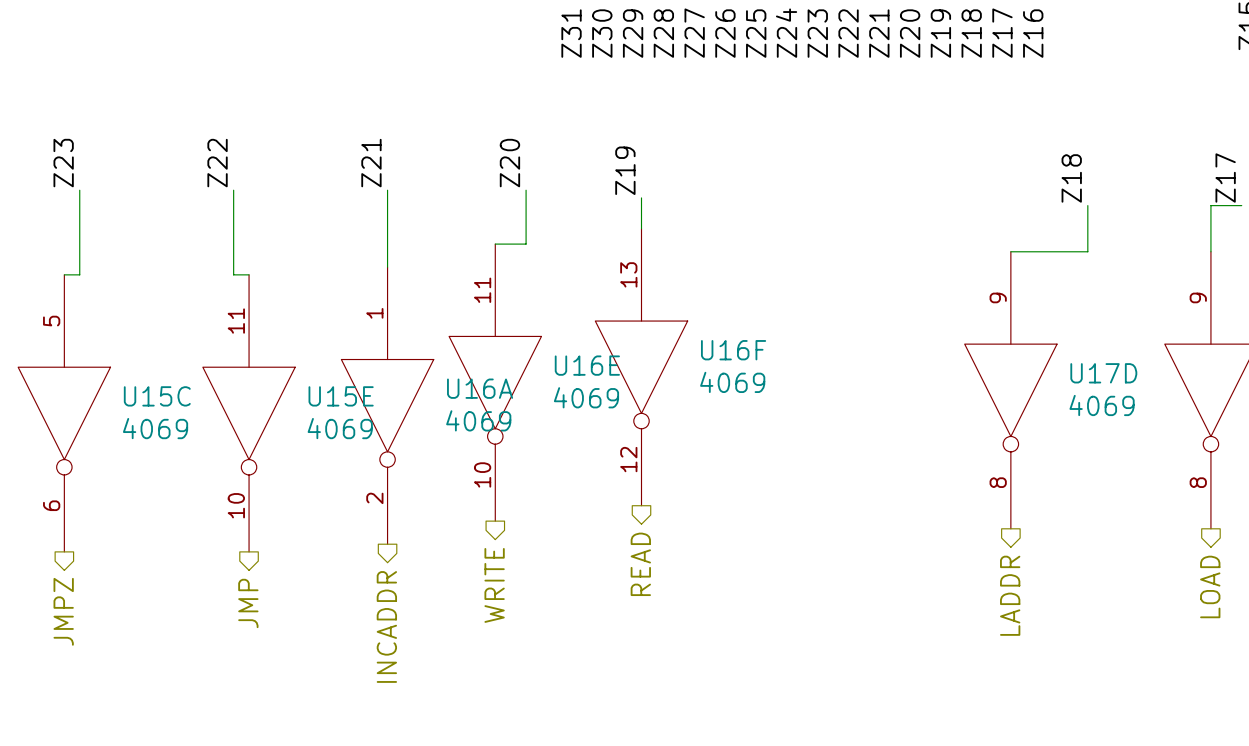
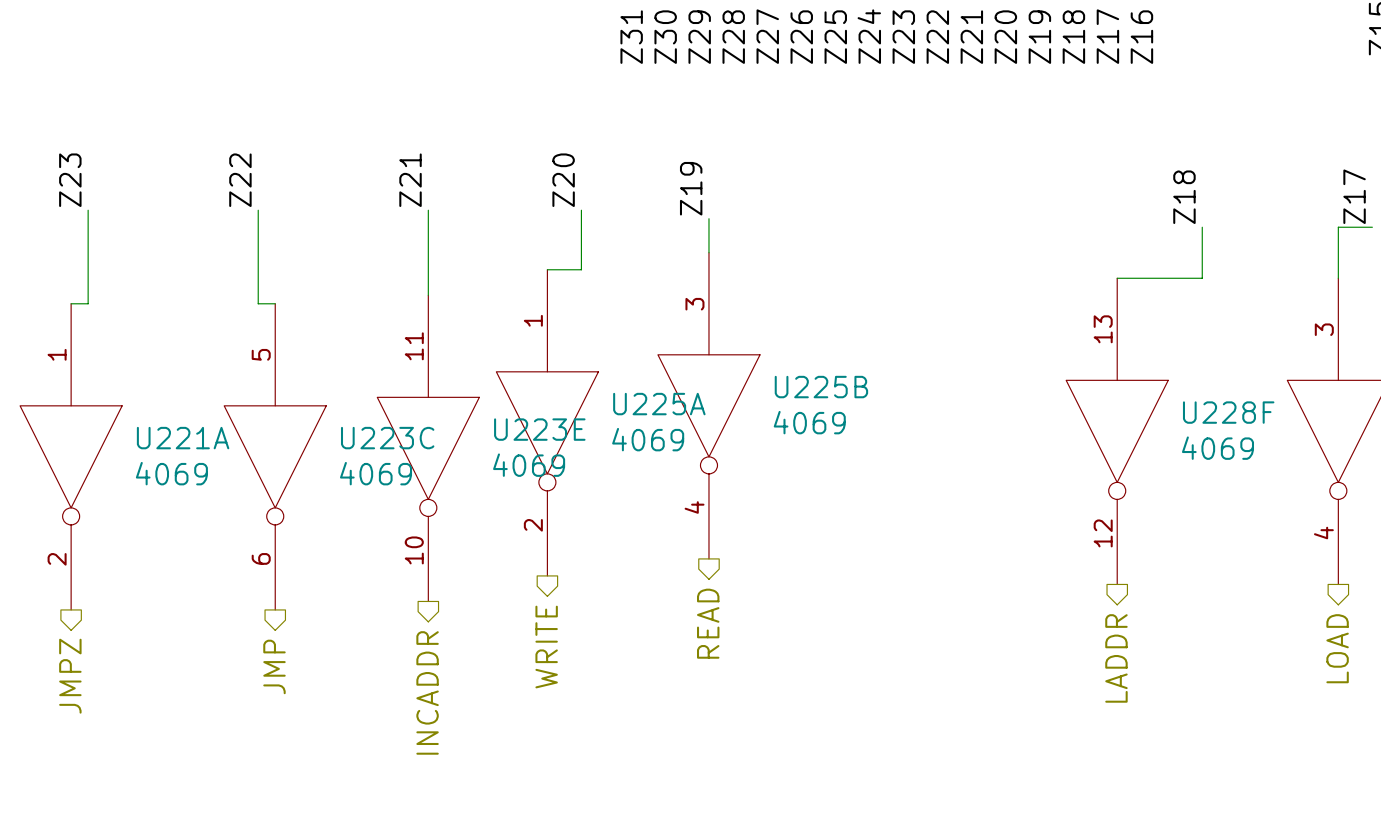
U16F pin number: 13 (628, 274) -> 3 (694, 304)
U16E pin number: 11 (482, 290) -> 1 (533, 320)
U17D pin number: 9 (998, 297) -> 13 (1103, 329)
part pin number: 9 (1198, 297) -> 3 (1324, 329)
U16A pin number: 1 (374, 313) -> 11 (414, 346)
U15C pin number: 5 (51, 321) -> 1 (57, 354)
U15E pin number: 11 (236, 321) -> 5 (261, 354)
U16F name: U16F (733, 350) -> U225B (821, 387)
U16E name: U16E (587, 365) -> U225A (659, 404)
U17D name: U17D (1103, 373) -> U228F (1228, 412)
U16A name: U16A (480, 388) -> U223E (539, 429)
U15C name: U15C (157, 396) -> U221A (183, 438)
U15E name: U15E (341, 396) -> U223C (387, 438)
U16F pin number: 12 (628, 459) -> 4 (694, 507)
U16E pin number: 10 (482, 474) -> 2 (533, 525)
U17D pin number: 8 (998, 482) -> 12 (1103, 533)
part pin number: 8 (1198, 482) -> 4 (1323, 533)
U16A pin number: 2 (374, 498) -> 10 (414, 550)
U15C pin number: 6 (51, 505) -> 2 (57, 559)
U15E pin number: 10 (236, 505) -> 6 (261, 558)

